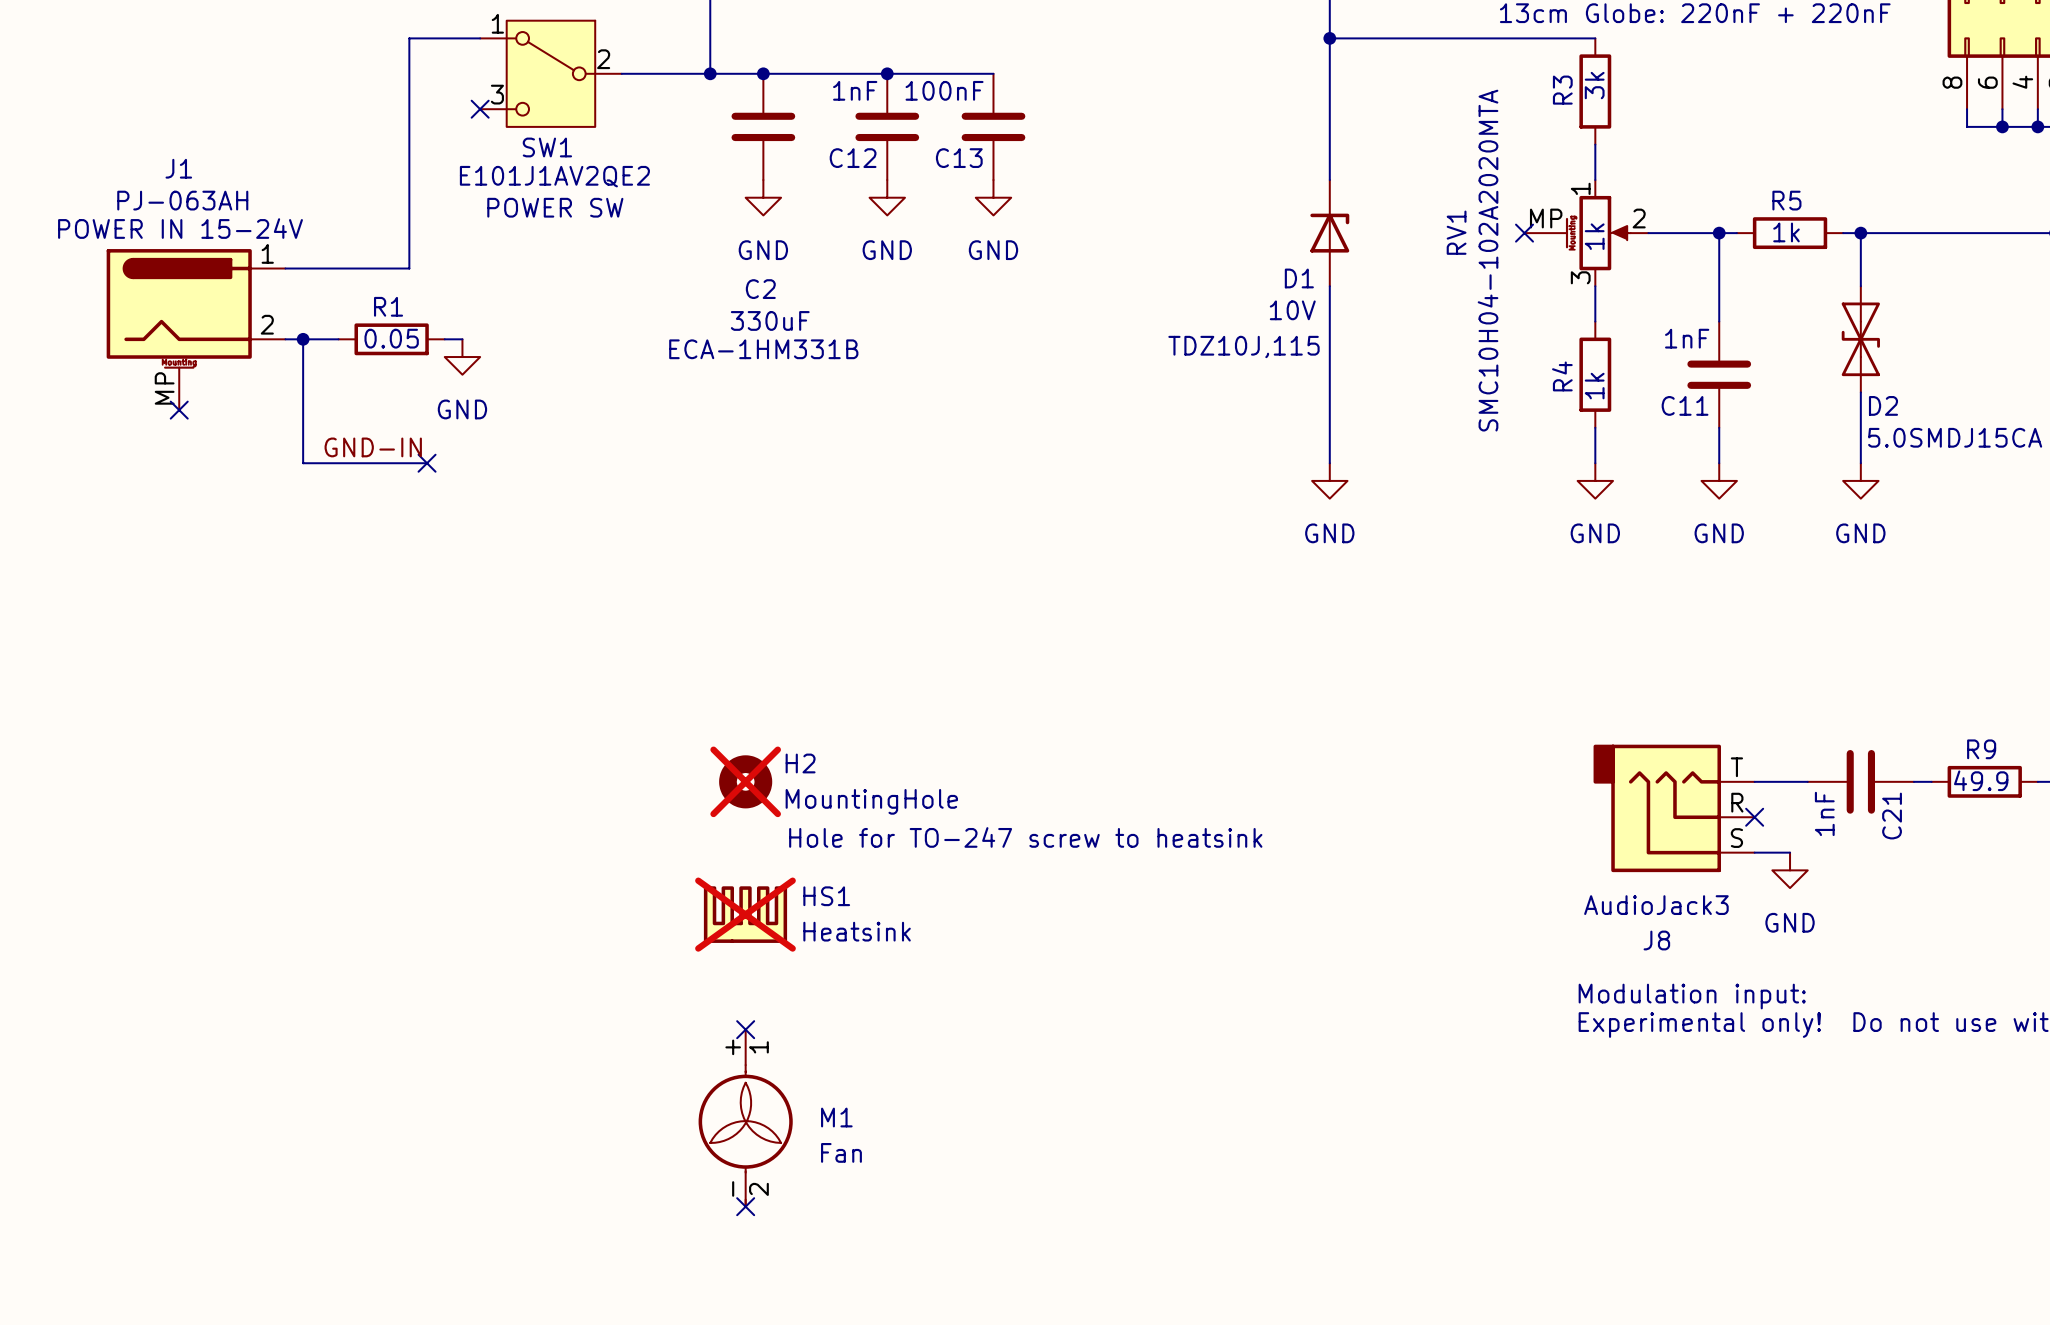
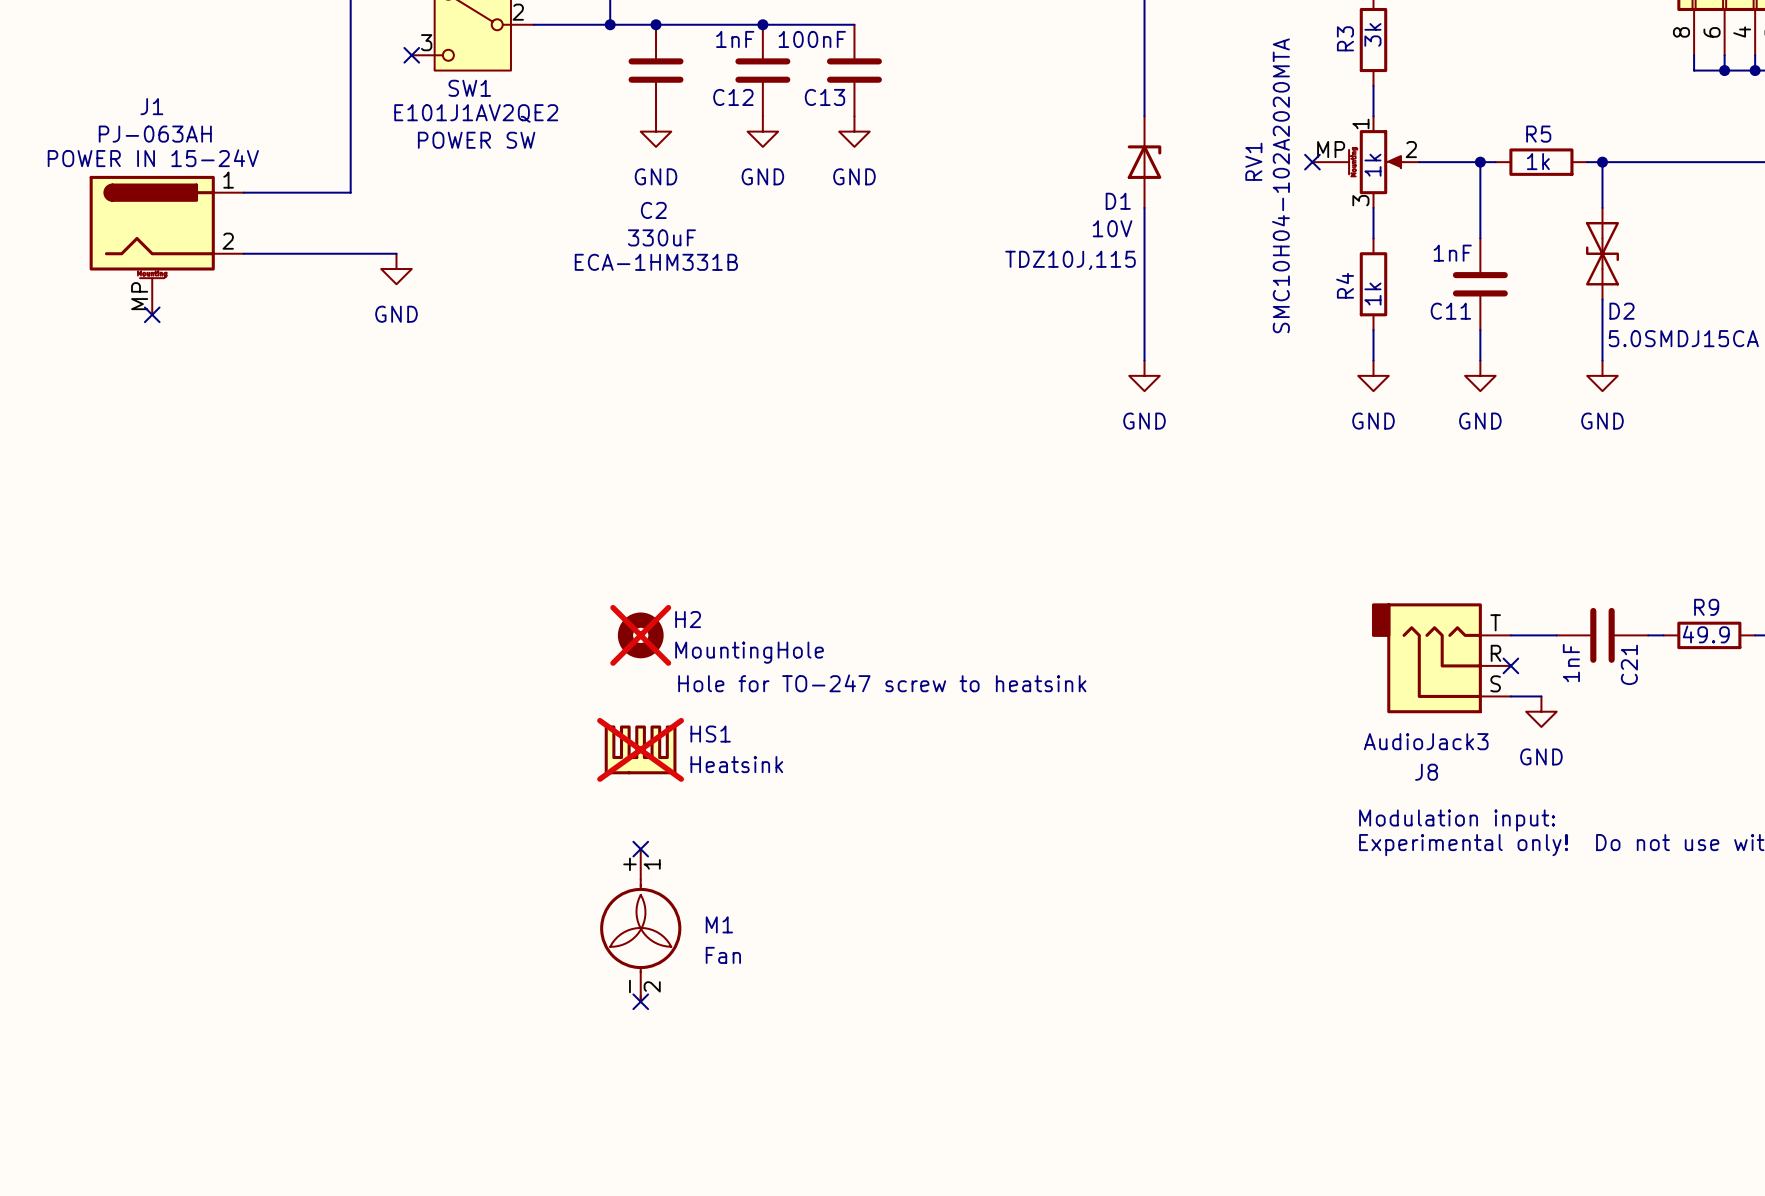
wire: (303, 339) (303, 463) (427, 463) -> none
junction: (303, 339) -> none
wire: none -> (289, 253) (381, 253)
R1: 0.05 (391, 339) -> none
label: GND-IN (373, 447) -> none
no-connect mark: (427, 463) -> none

